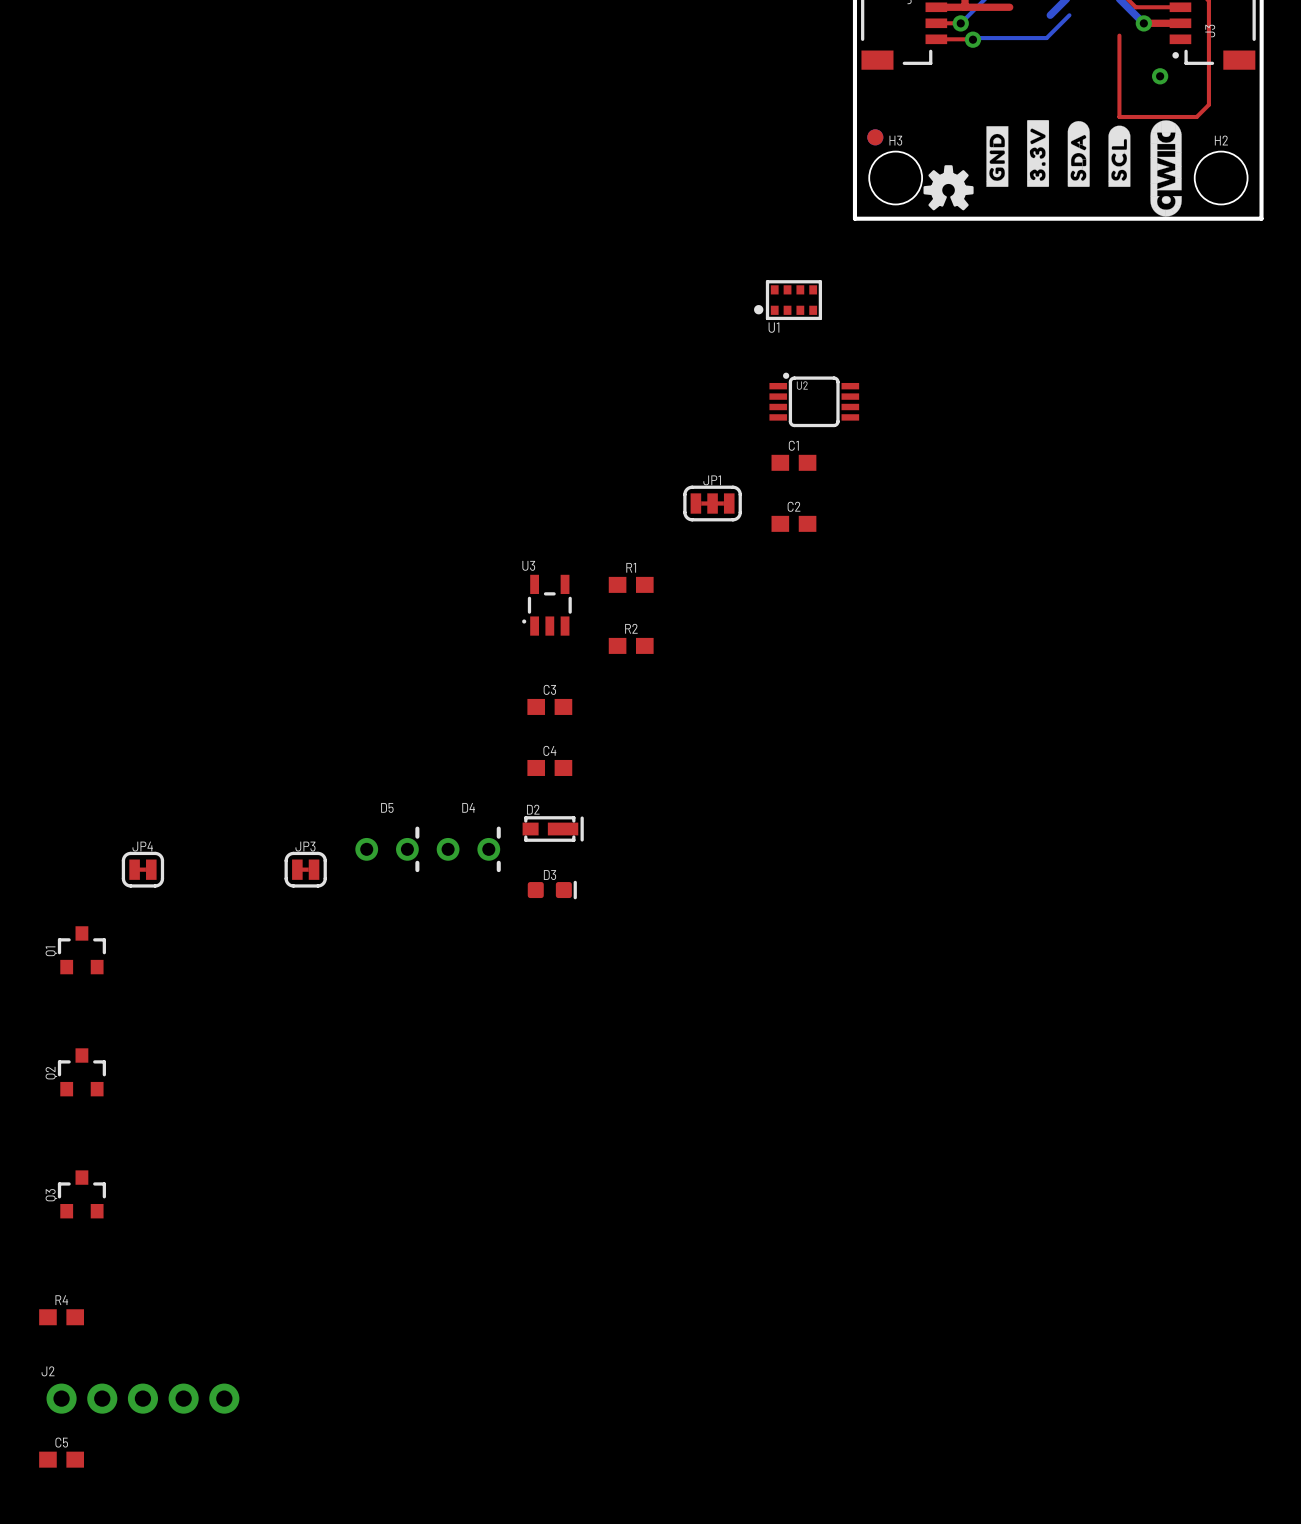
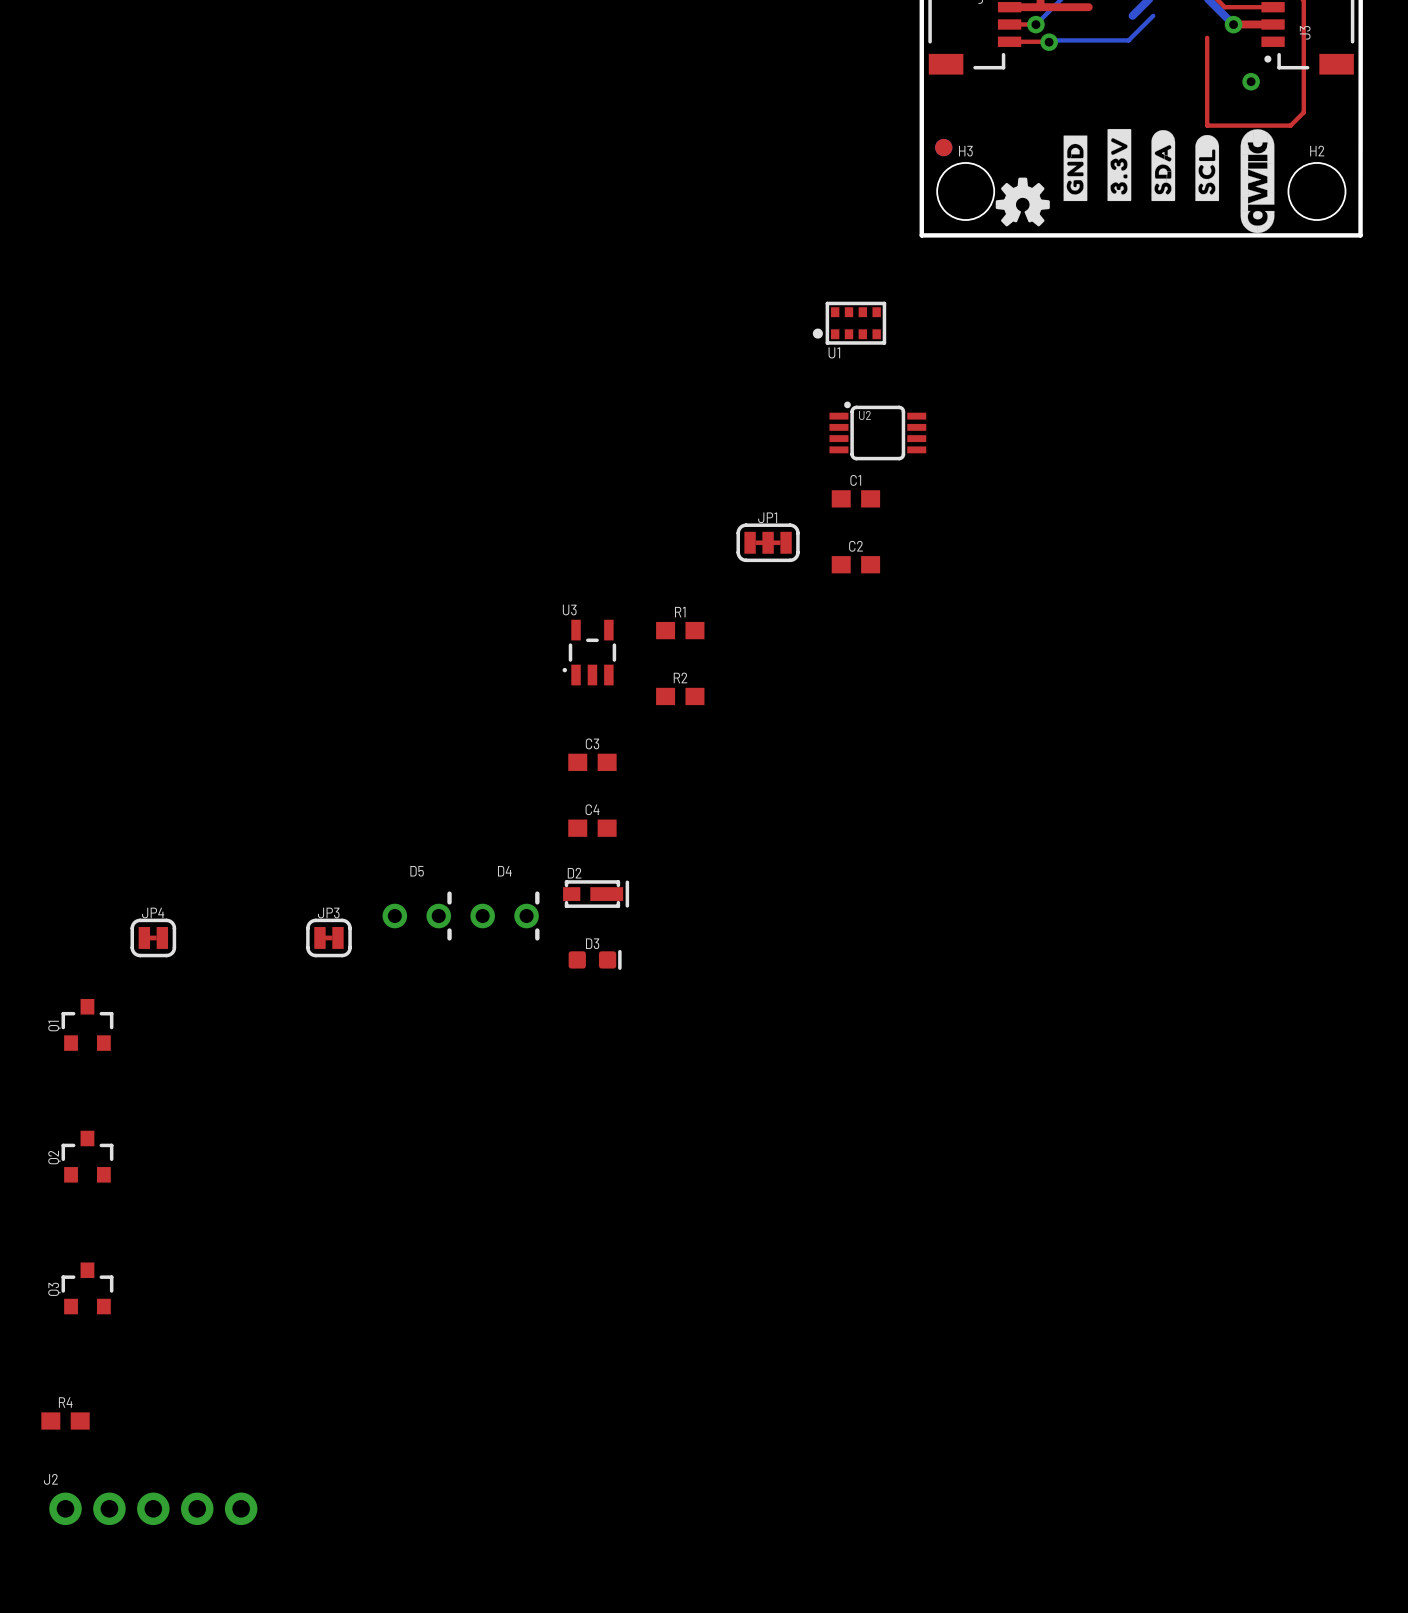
C5: (61, 1459) -> none

